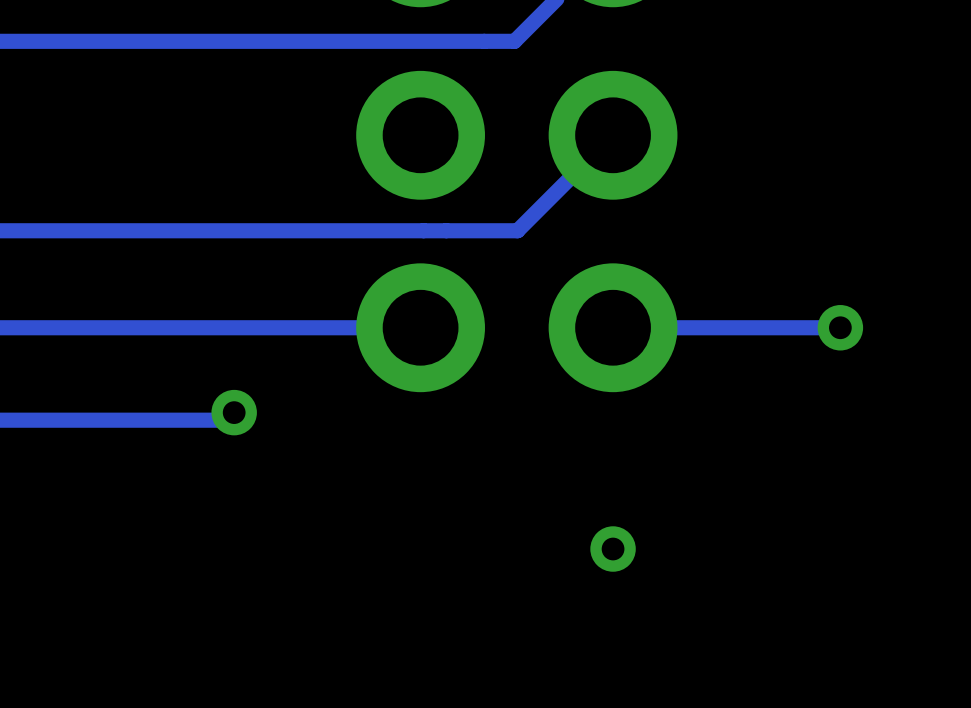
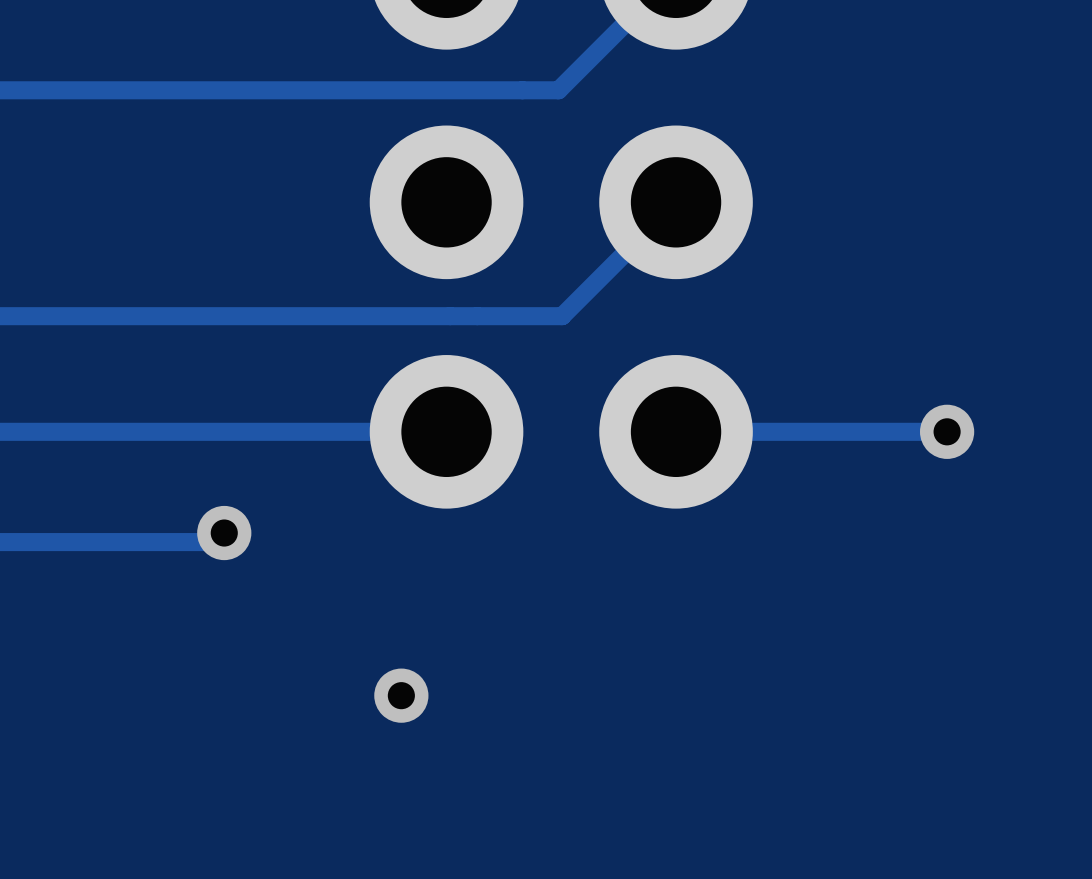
via position: (613, 549) -> (401, 695)

